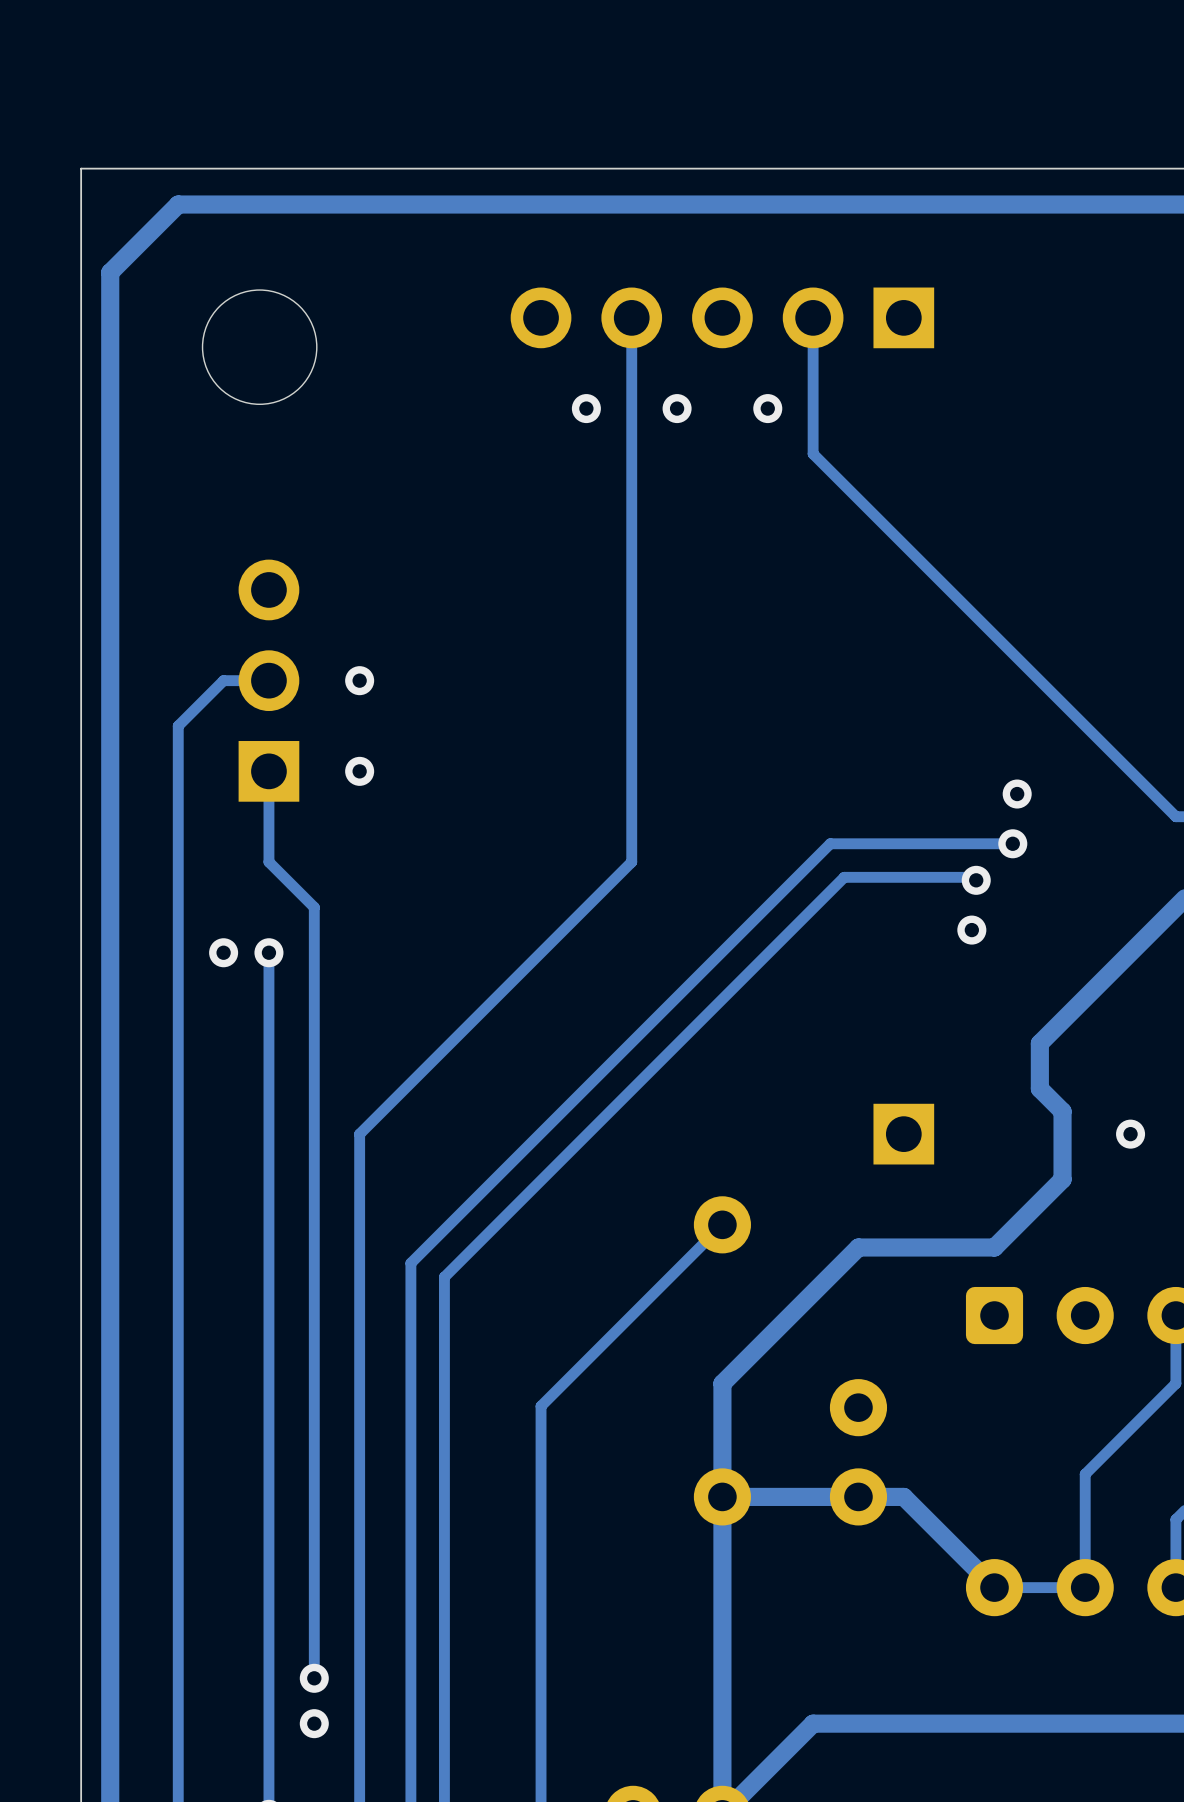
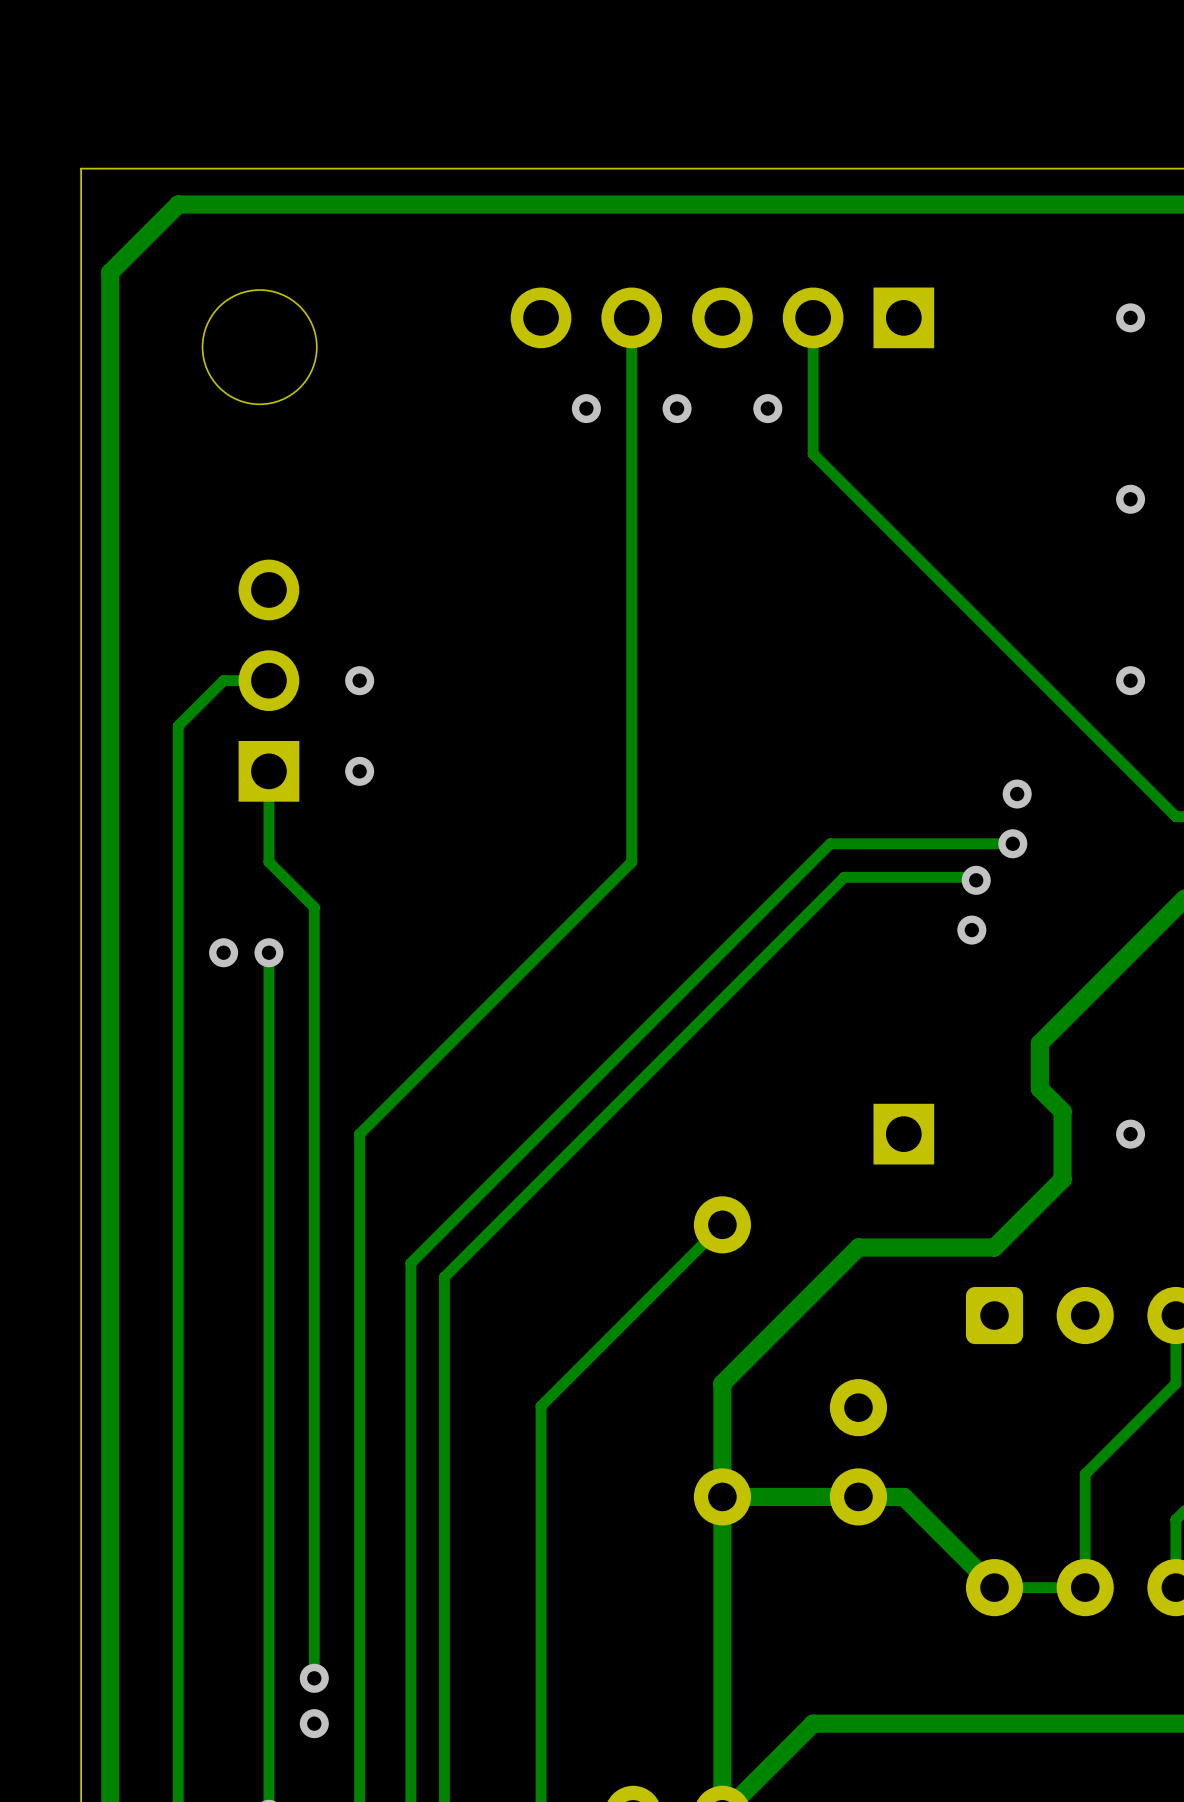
via: none -> (1130, 317)
via: none -> (1130, 499)
via: none -> (1130, 680)

